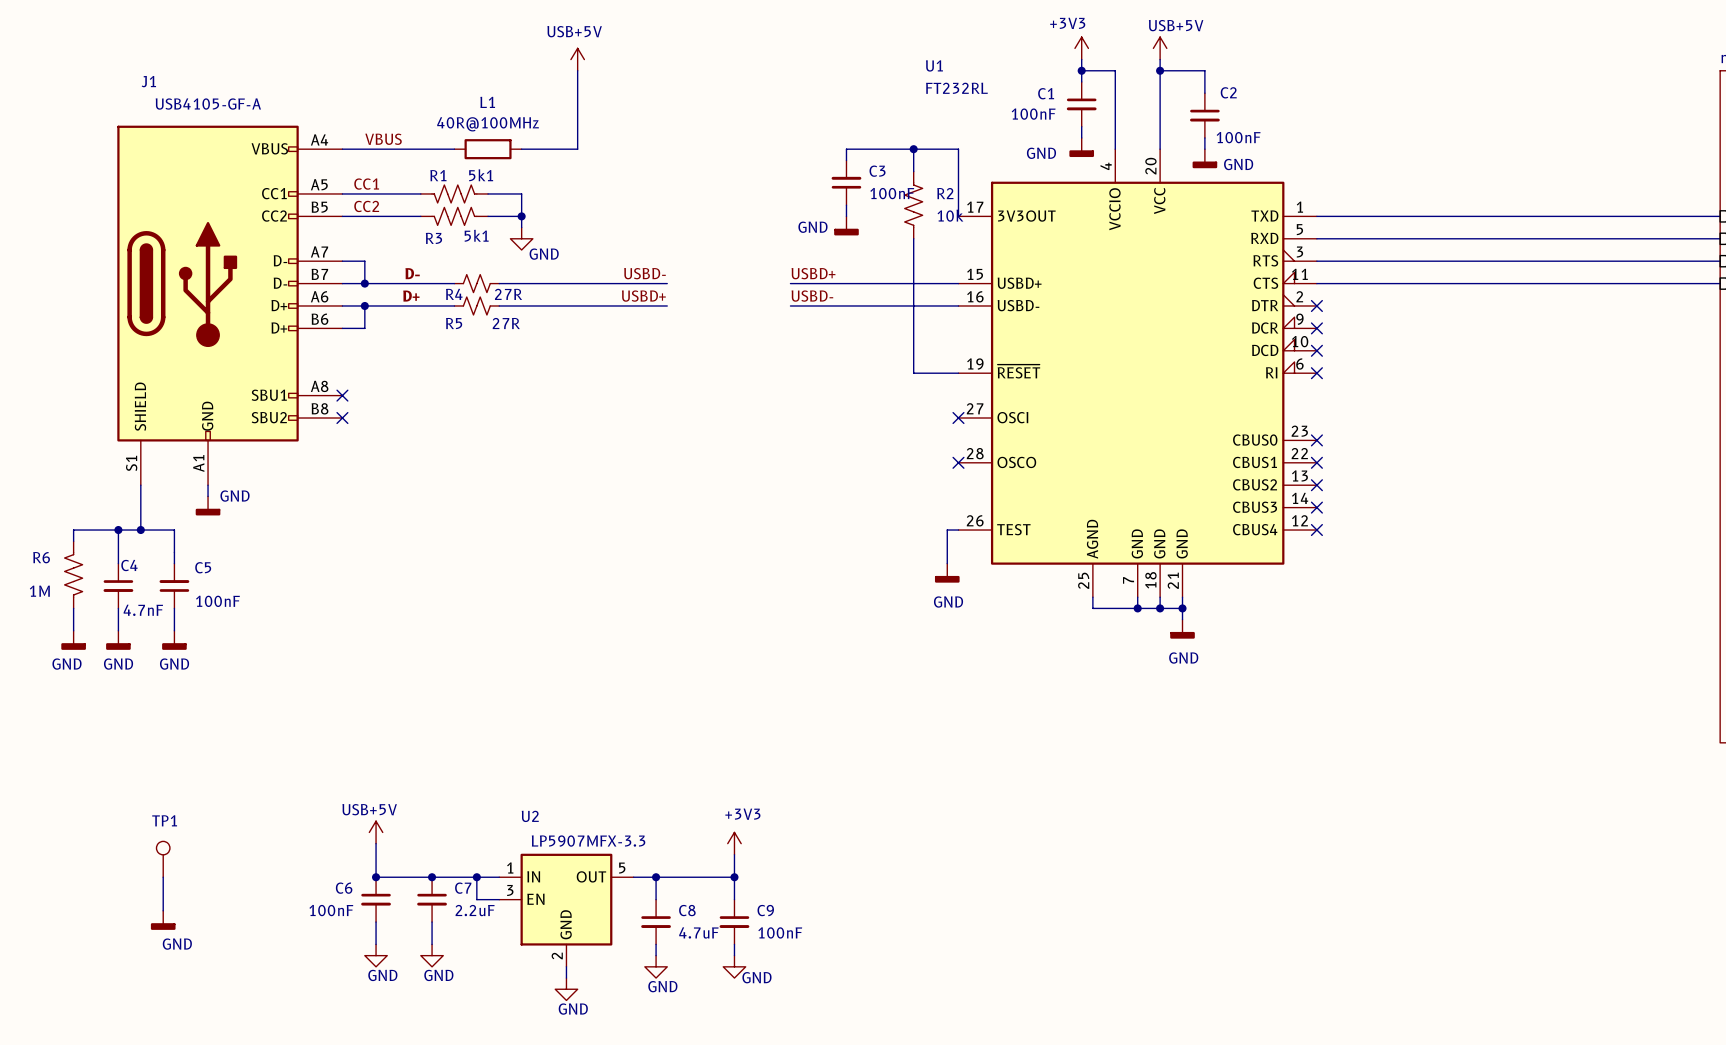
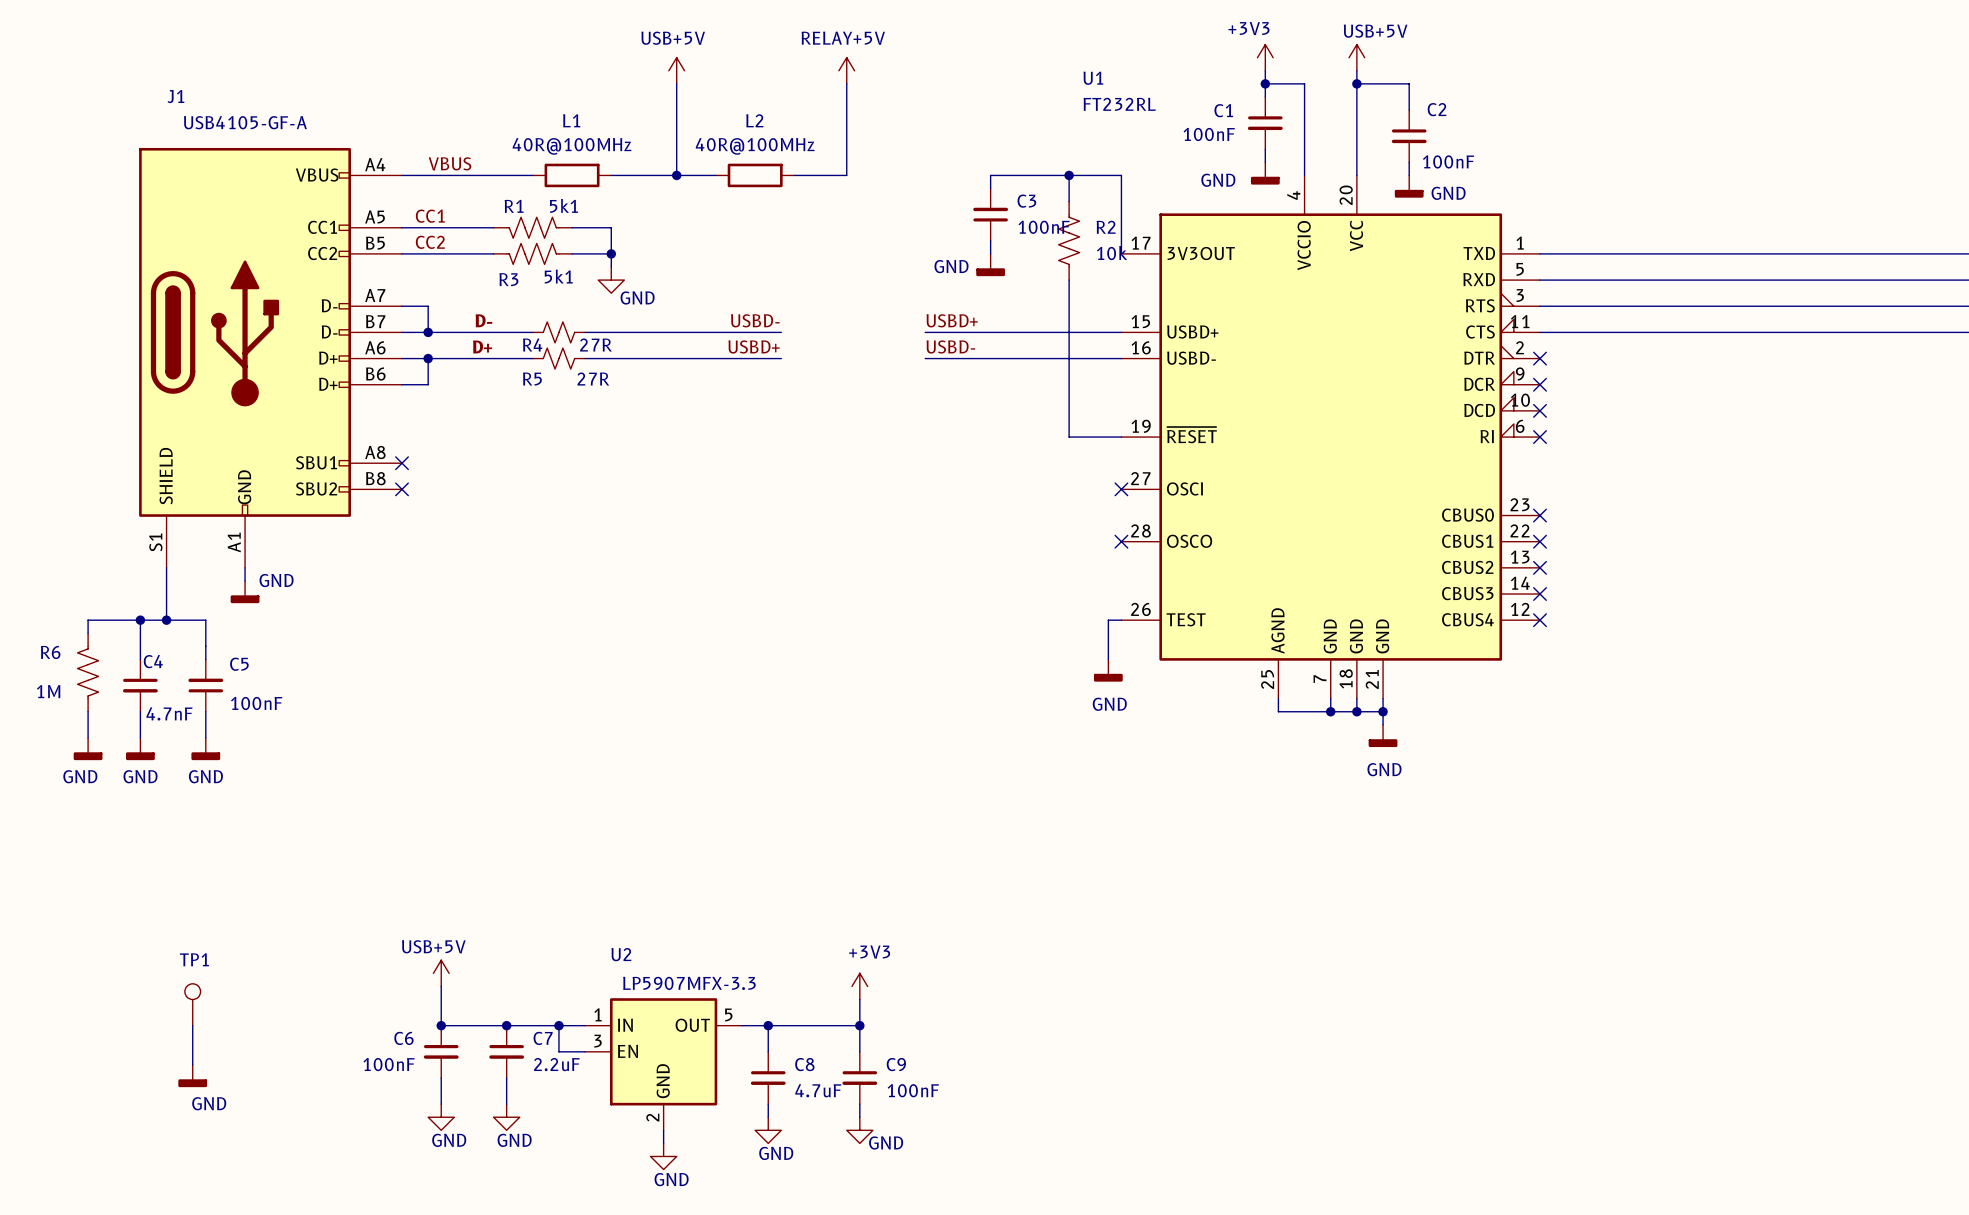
power symbol: none -> RELAY+5V (846, 70)
wire: none -> (846, 83) (846, 175) (794, 175)
wire: none -> (676, 175) (715, 175)
junction: none -> (676, 175)
L2: none -> 40R@100MHz (755, 175)

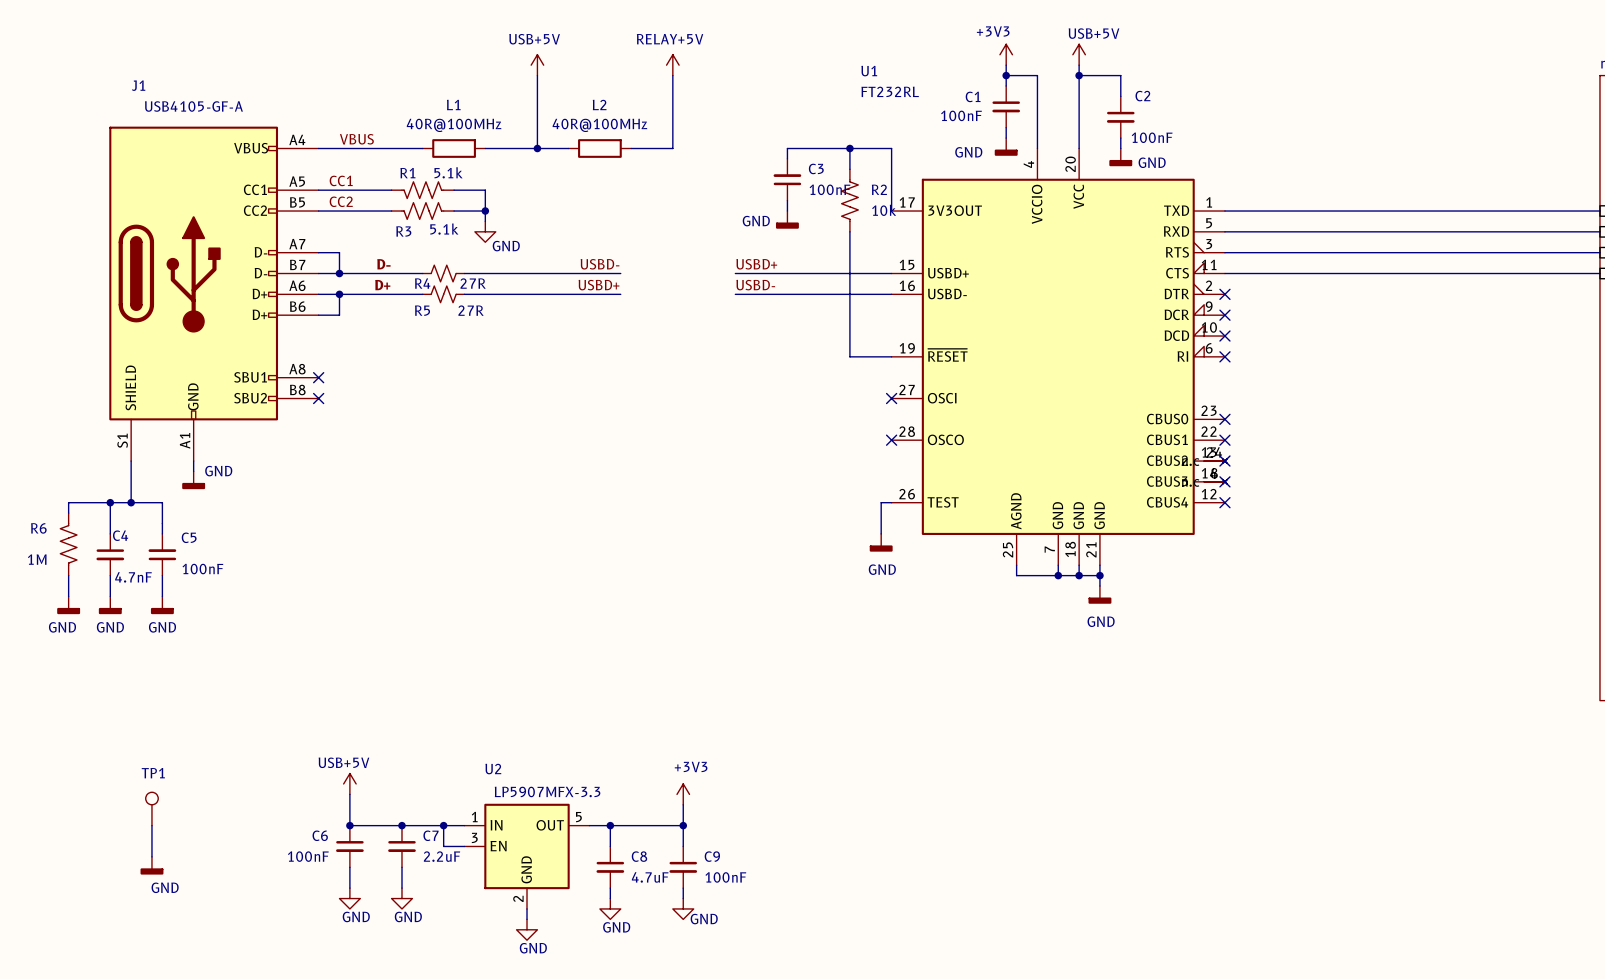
U1 symbol: [1121, 175, 1541, 699] -> [891, 148, 1228, 566]
R1 value: 5k1 (563, 205) -> 5.1k (448, 172)
R3 value: 5k1 (558, 276) -> 5.1k (444, 229)

